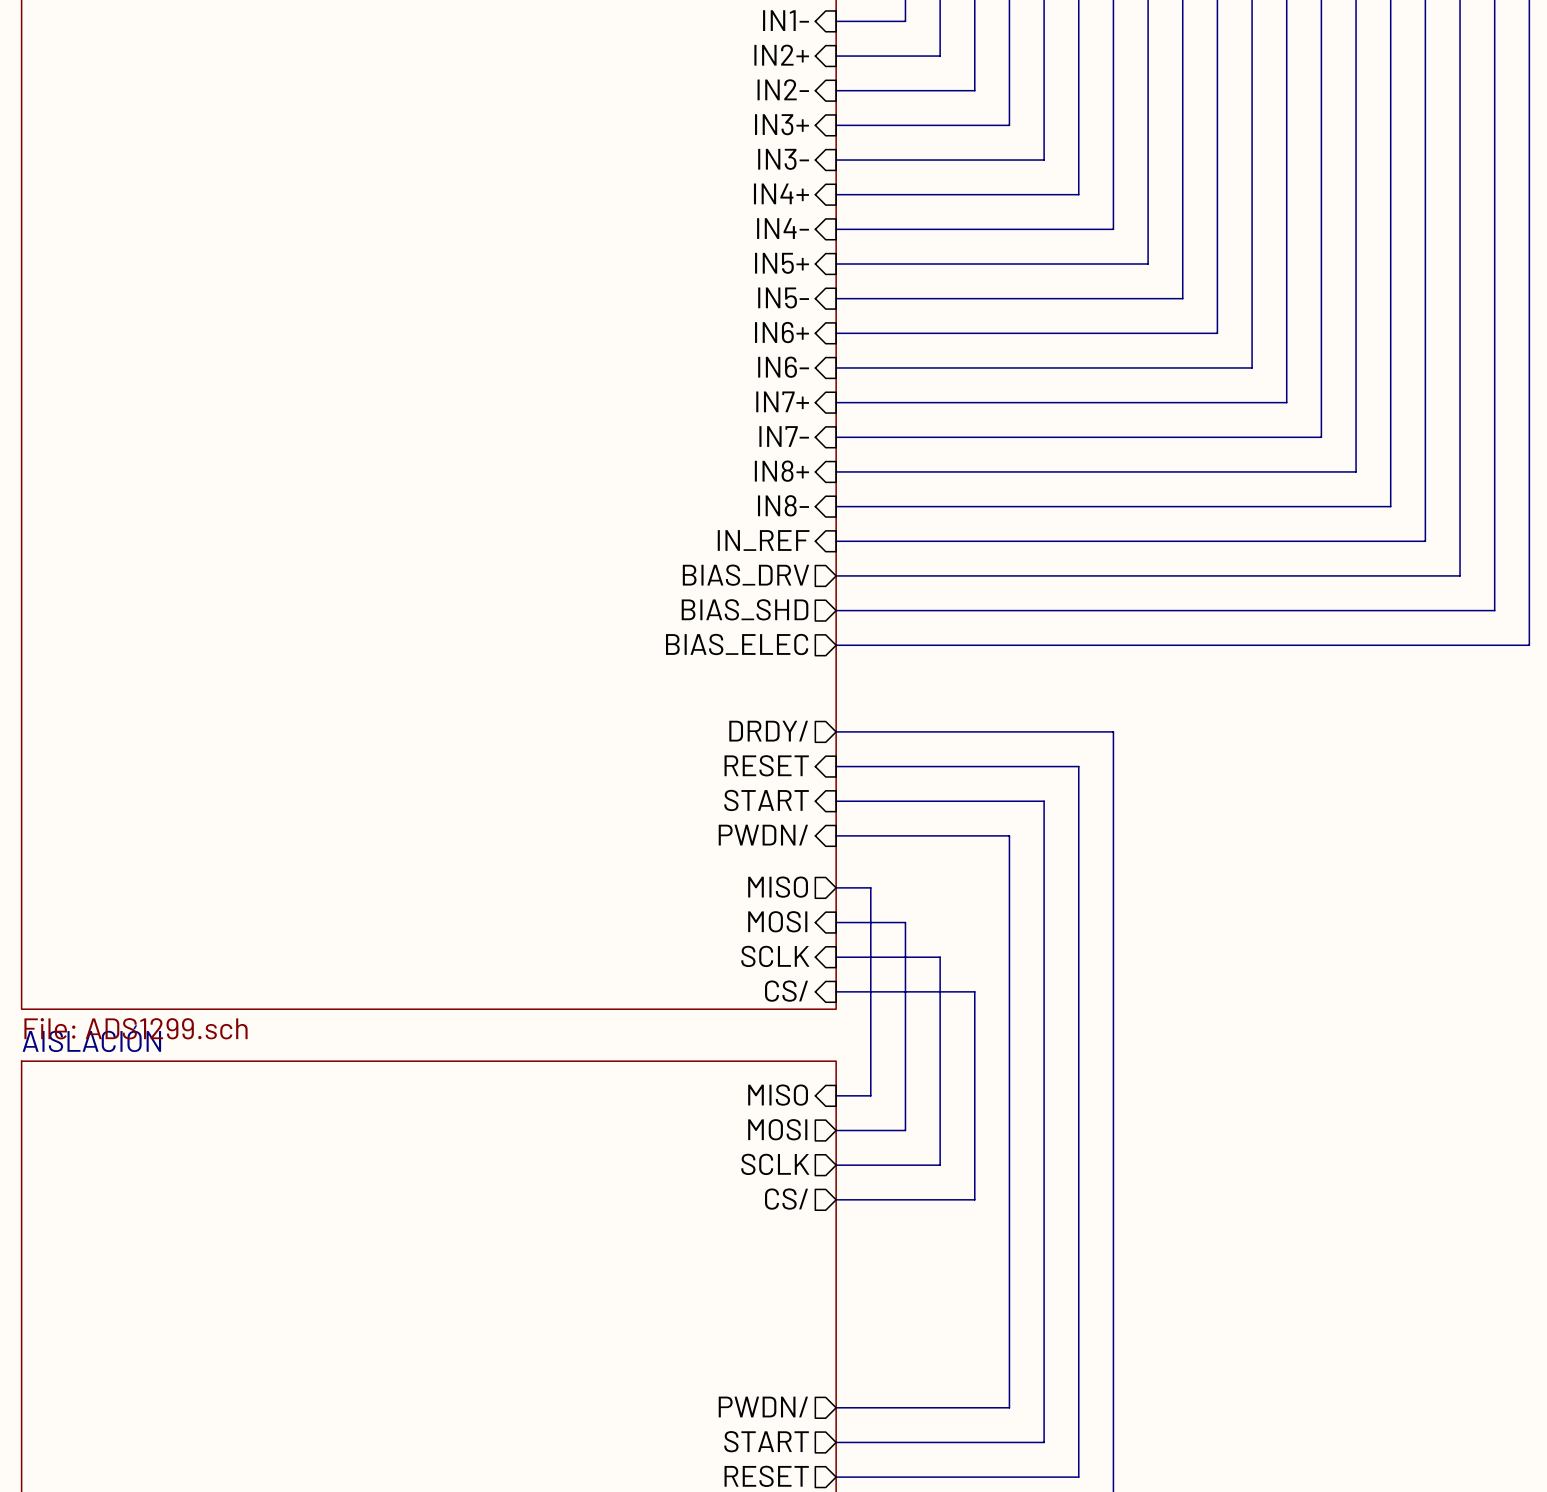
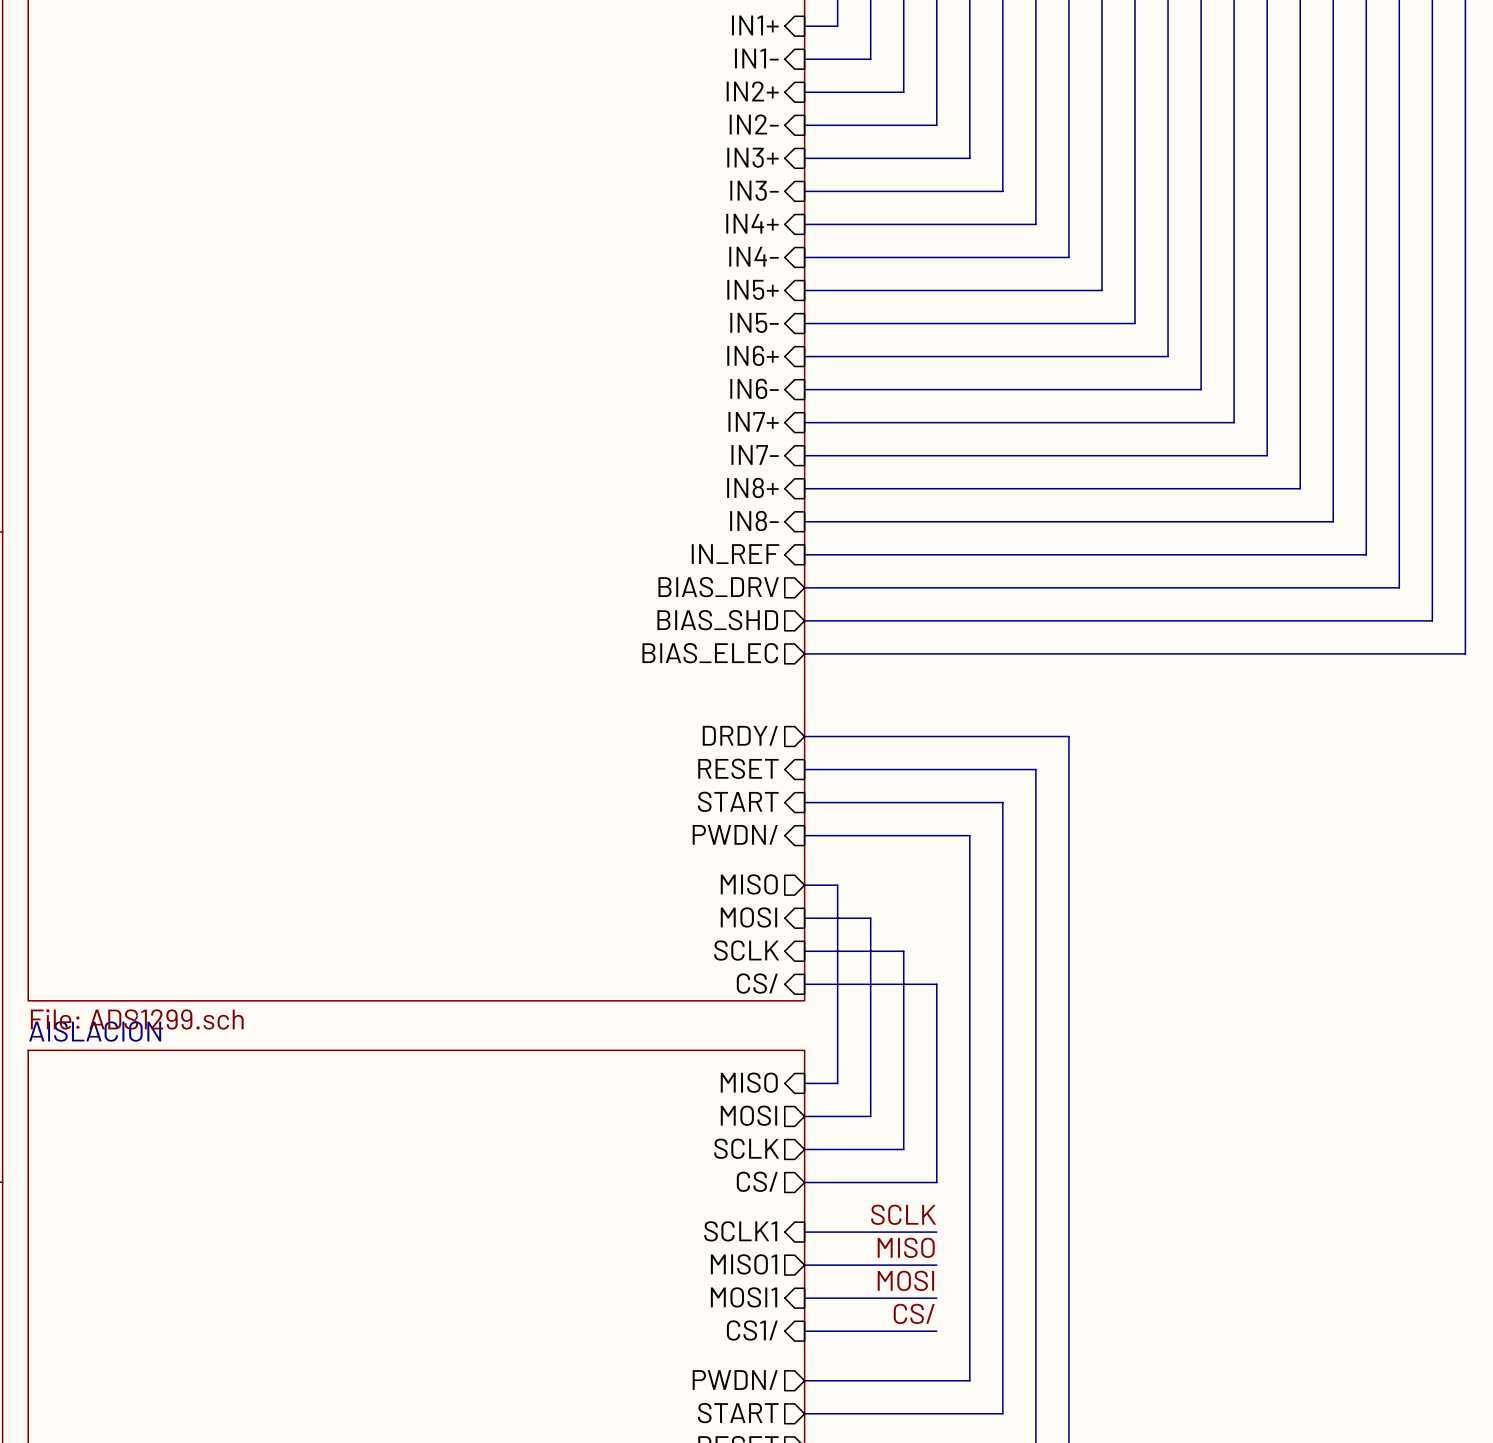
label: none -> SCLK (903, 1214)
sheet pin: none -> SCLK1 (740, 1231)
wire: none -> (804, 1232) (936, 1232)
label: none -> MISO (906, 1247)
sheet pin: none -> MISO1 (744, 1264)
wire: none -> (804, 1265) (936, 1265)
label: none -> MOSI (905, 1280)
sheet pin: none -> MOSI1 (744, 1297)
wire: none -> (804, 1298) (936, 1298)
label: none -> CS/ (914, 1313)
sheet pin: none -> CS1/ (752, 1330)
wire: none -> (804, 1331) (936, 1331)

